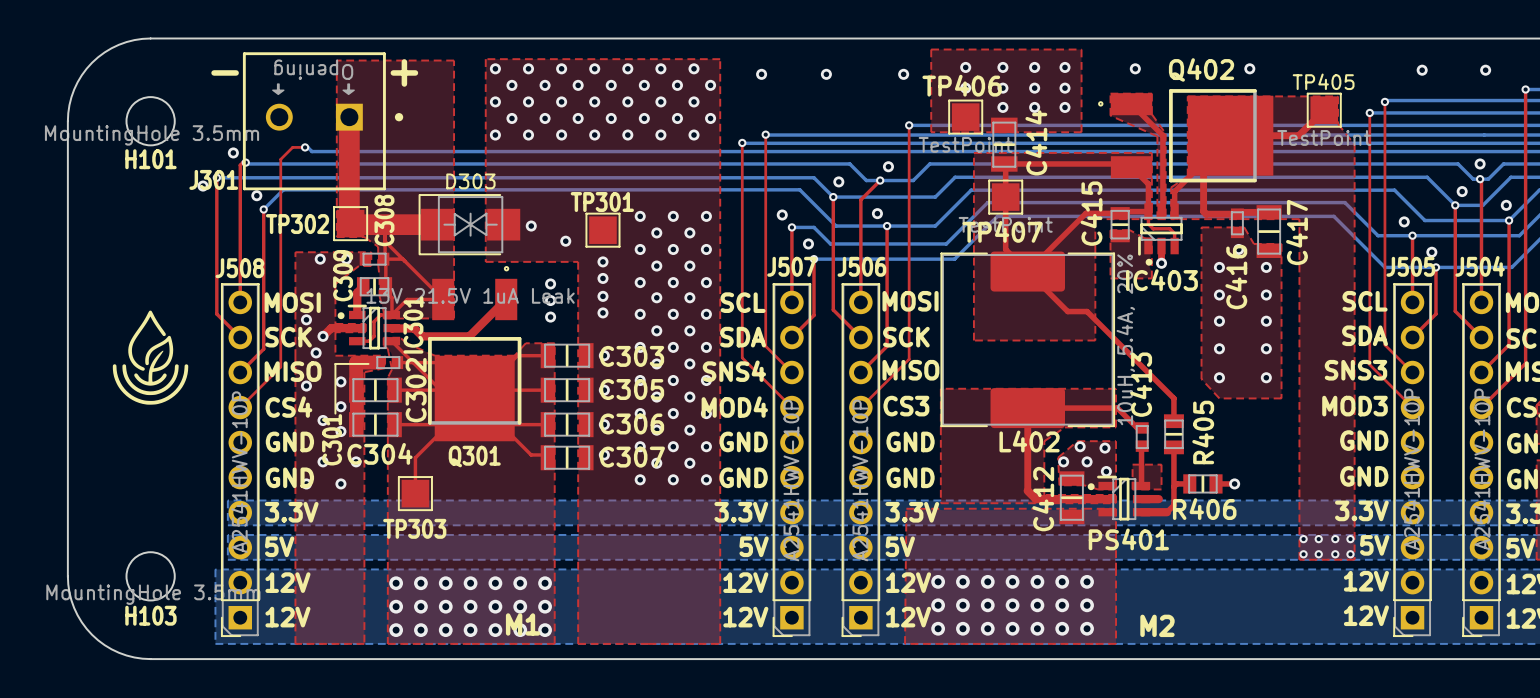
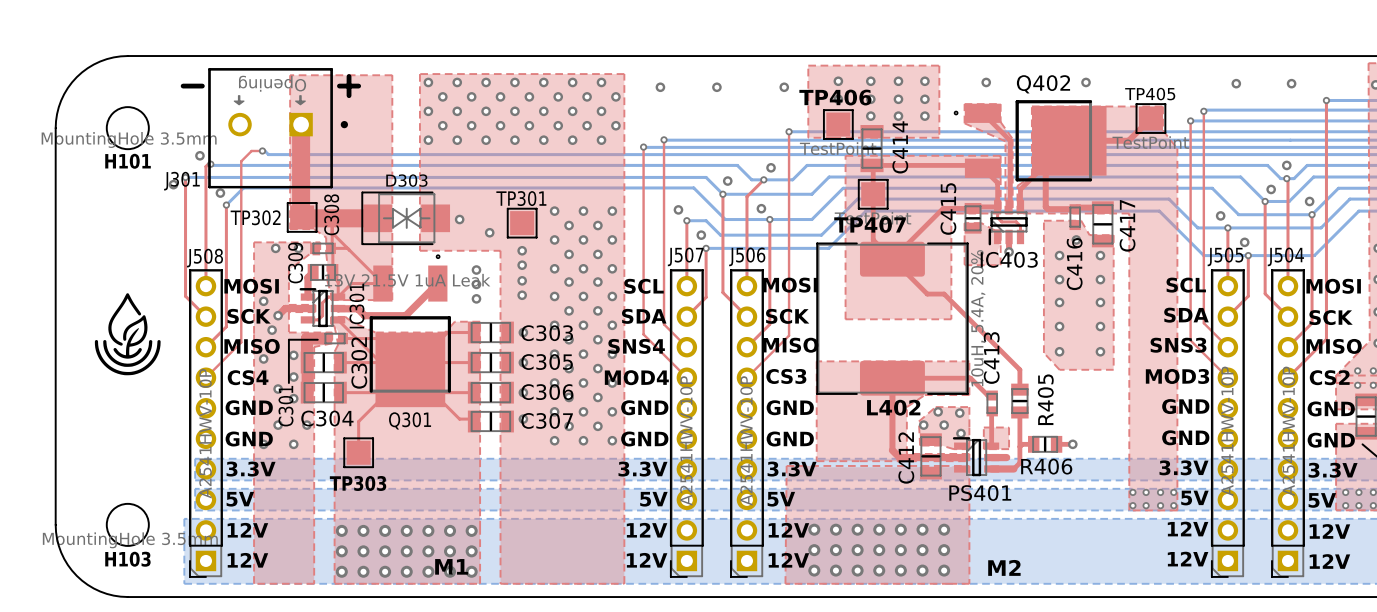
IC403 footprint: [1138, 203, 1183, 266] -> [988, 199, 1028, 246]
IC301 footprint: [337, 304, 401, 350] -> [299, 288, 346, 328]
PS401 footprint: [1087, 475, 1151, 521] -> [952, 437, 1000, 477]

